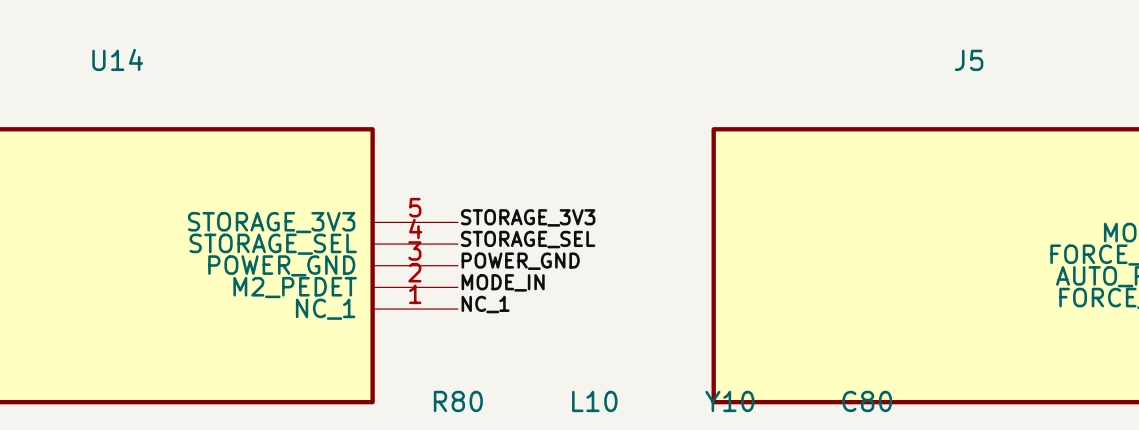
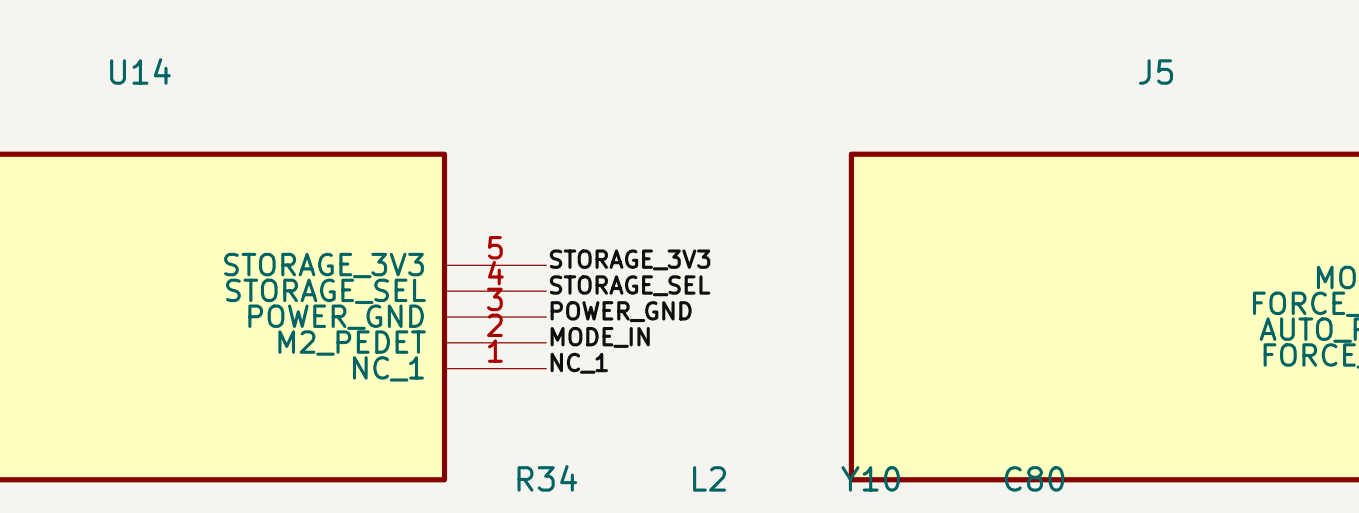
R80 name: R80 (458, 401) -> R34 (547, 478)
L10 name: L10 (594, 401) -> L2 (709, 478)

